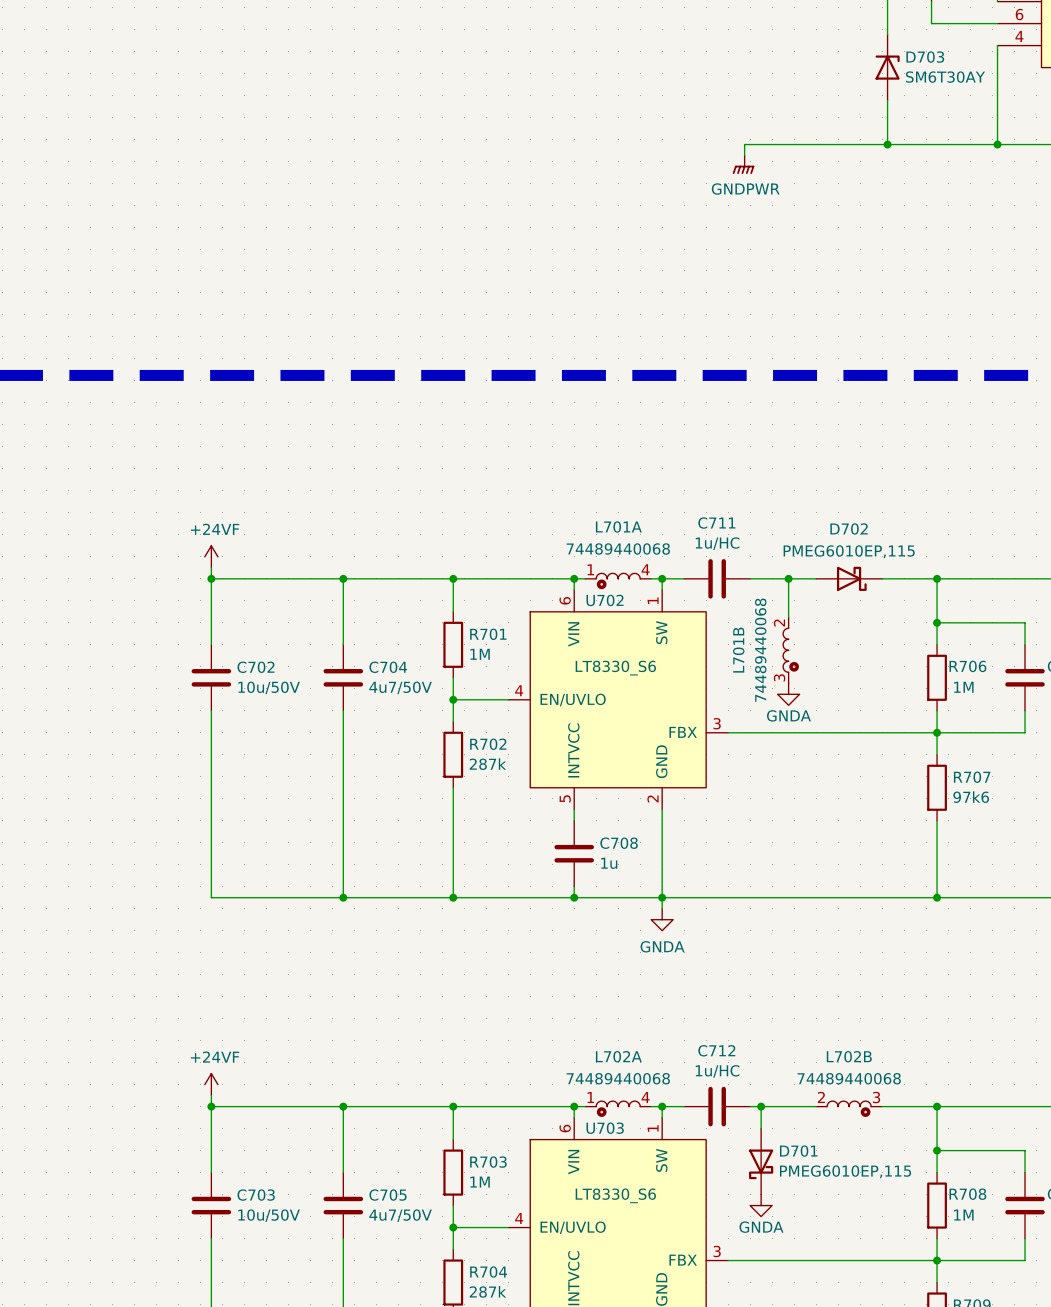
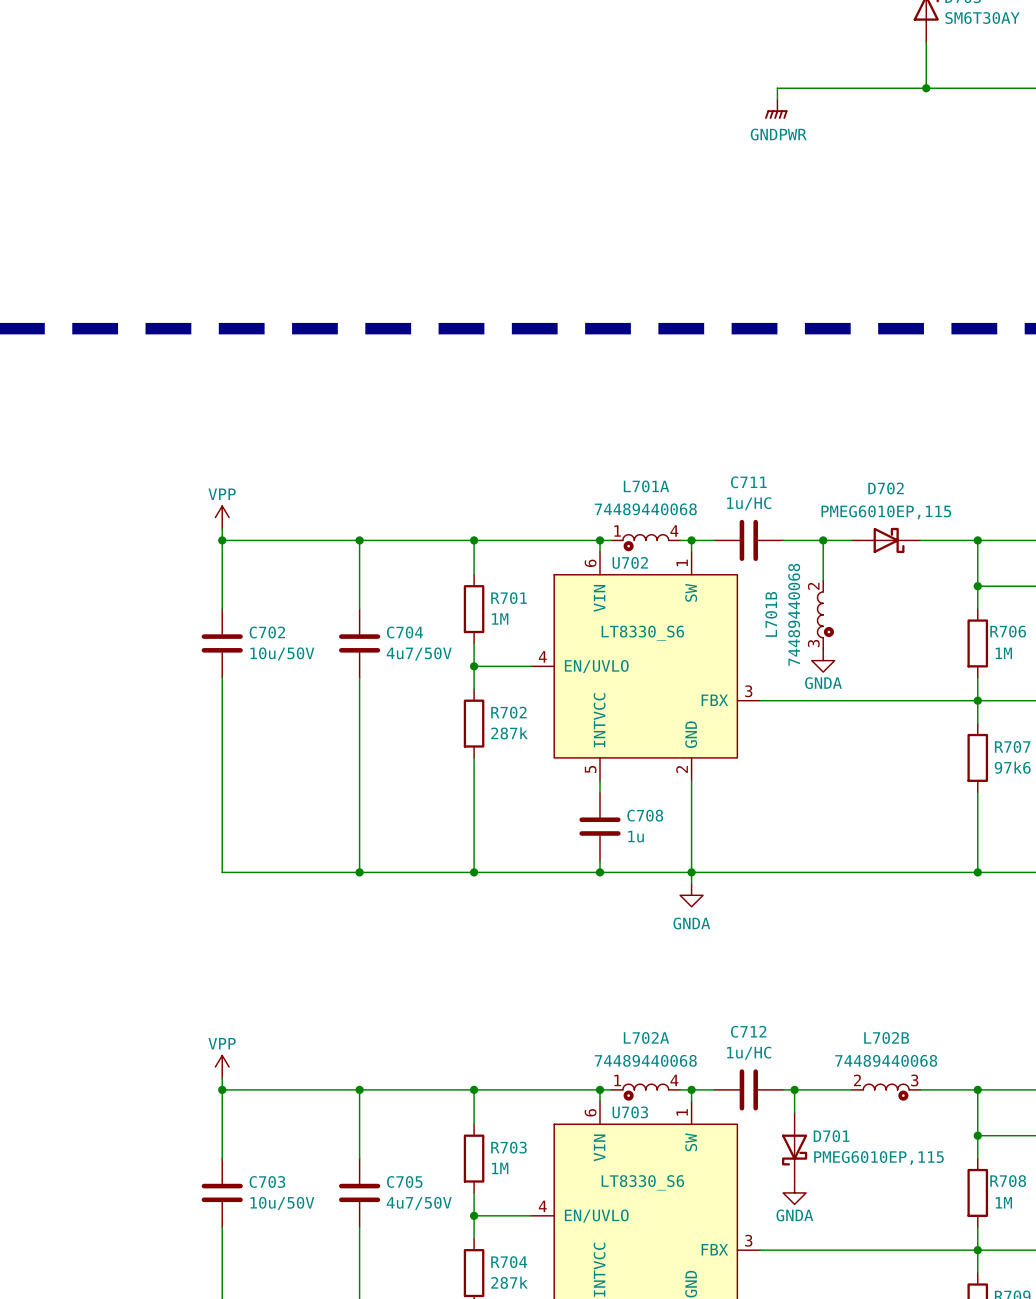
power symbol: +24VF (211, 556) -> VPP (222, 517)
power symbol: +24VF (211, 1084) -> VPP (222, 1067)

